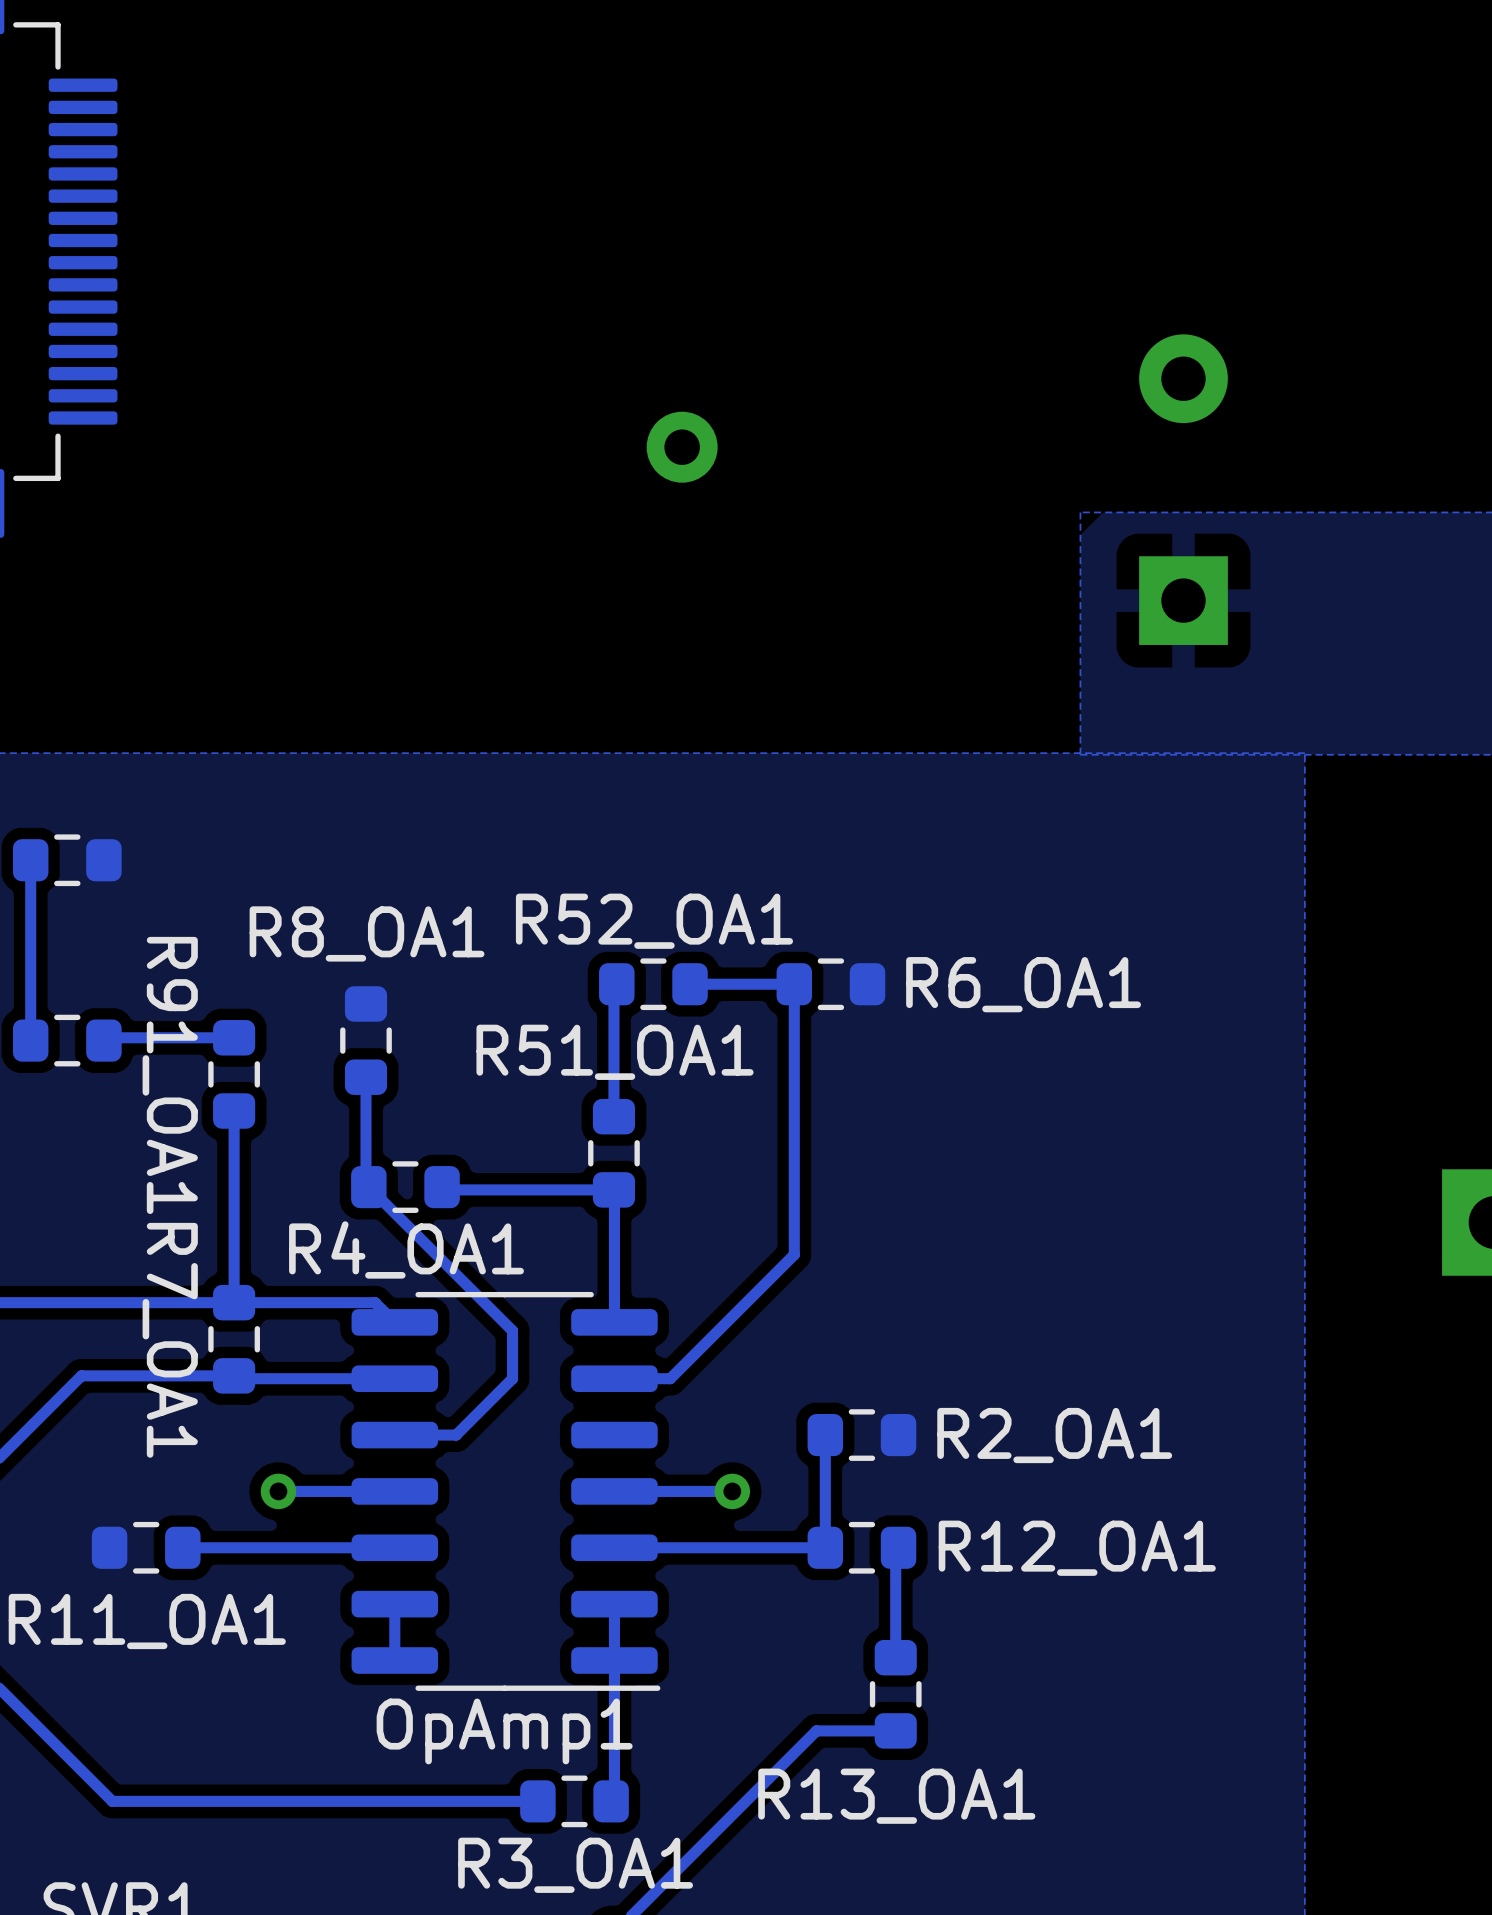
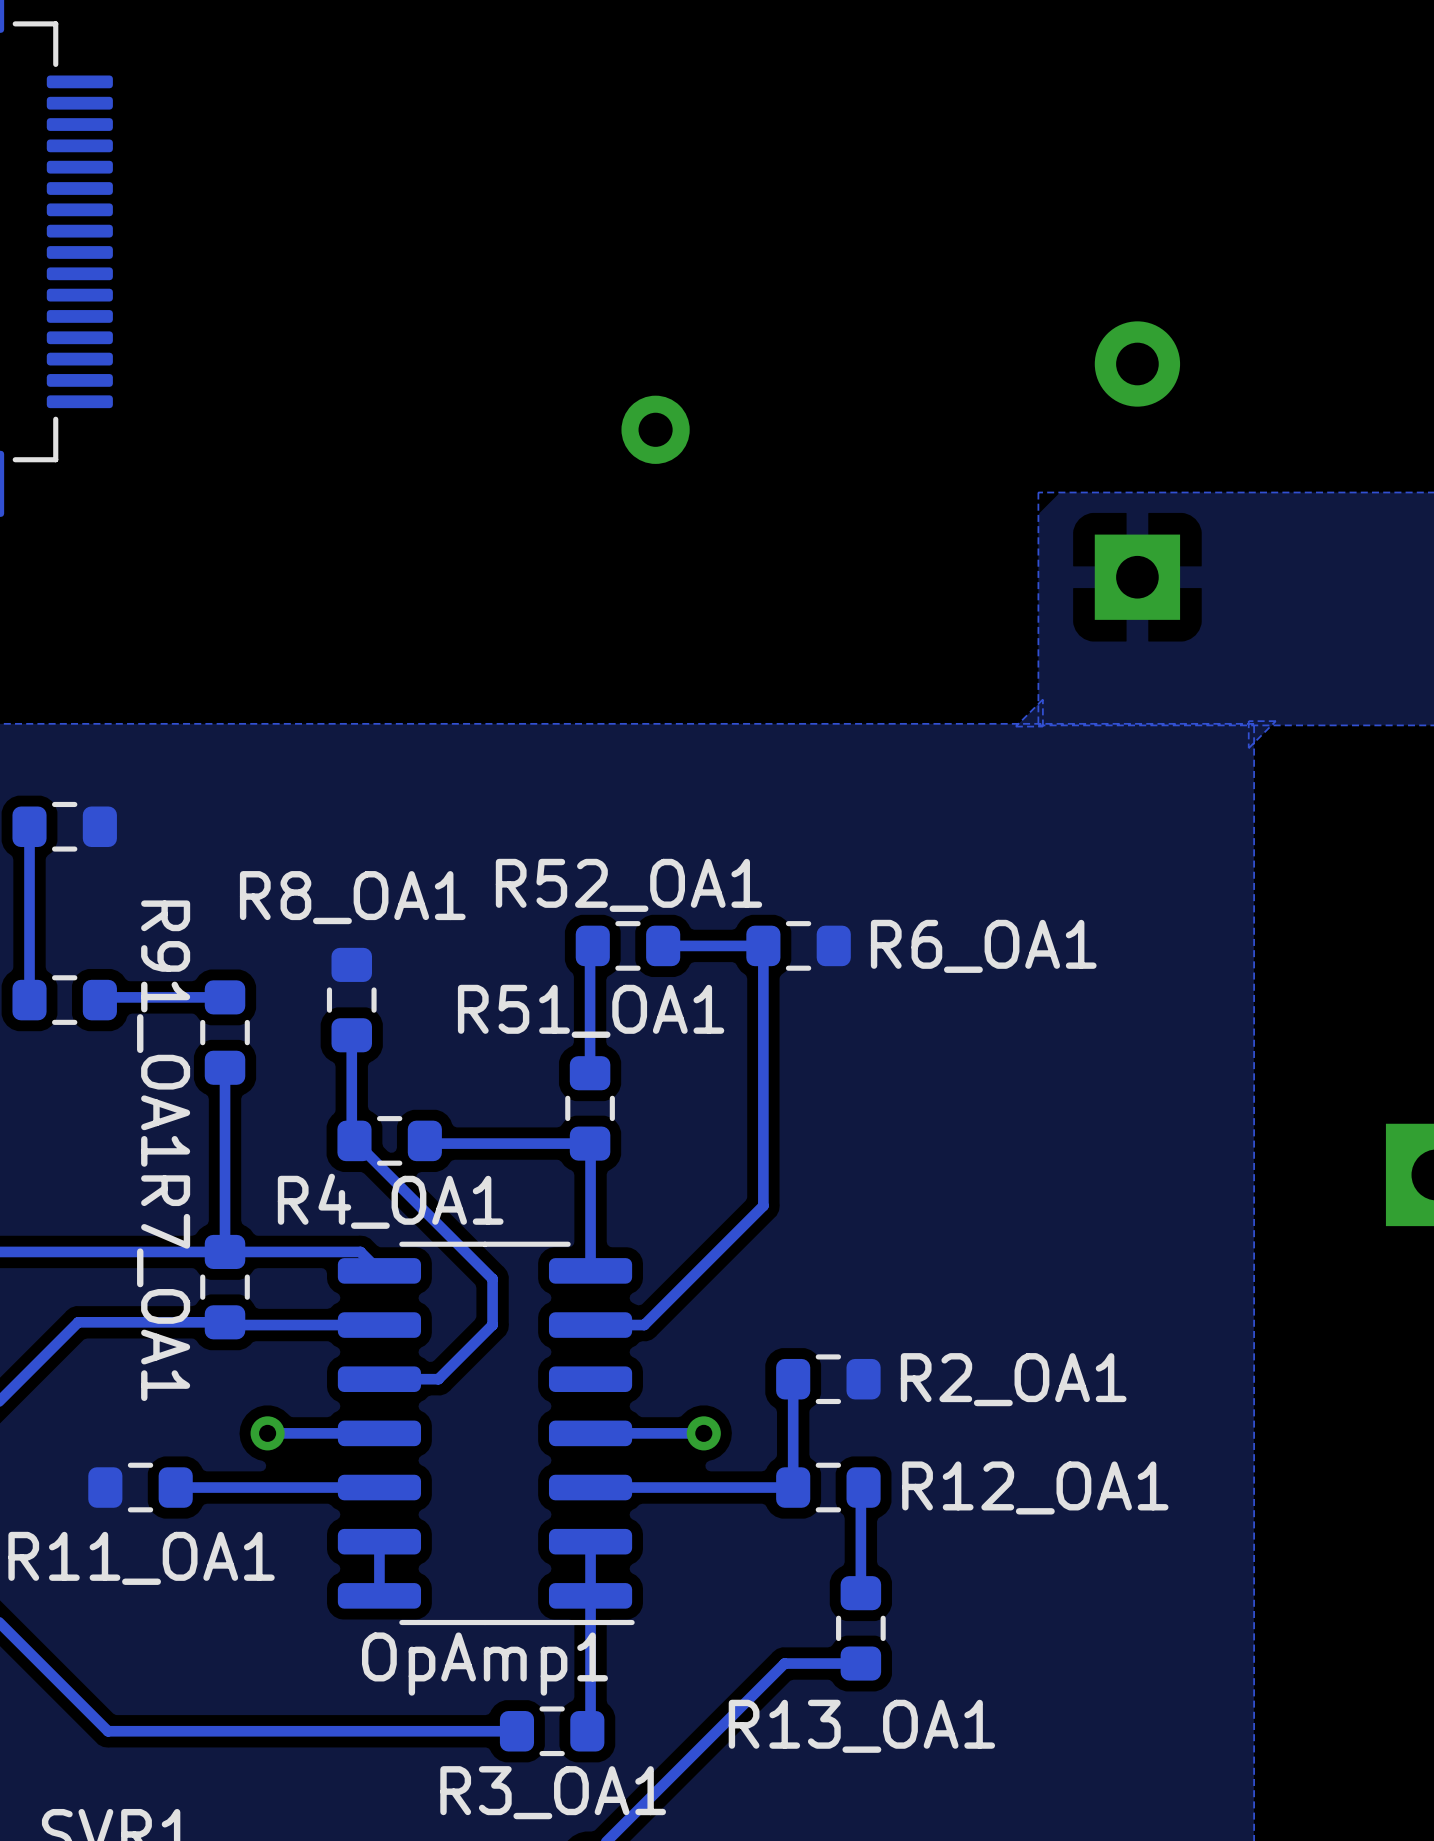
zone outline: none -> (1042, 699) (1042, 726) (1015, 726) (1042, 699)
zone outline: none -> (1275, 721) (1248, 721) (1248, 748) (1275, 721)

